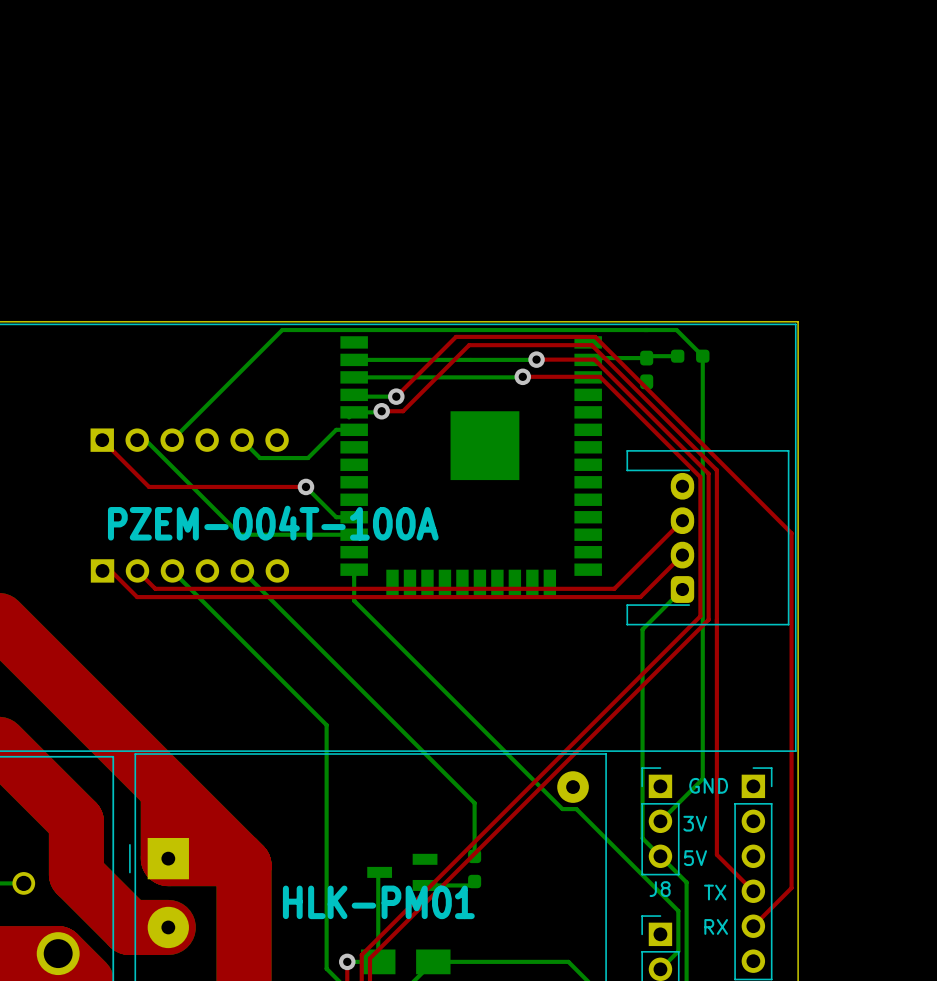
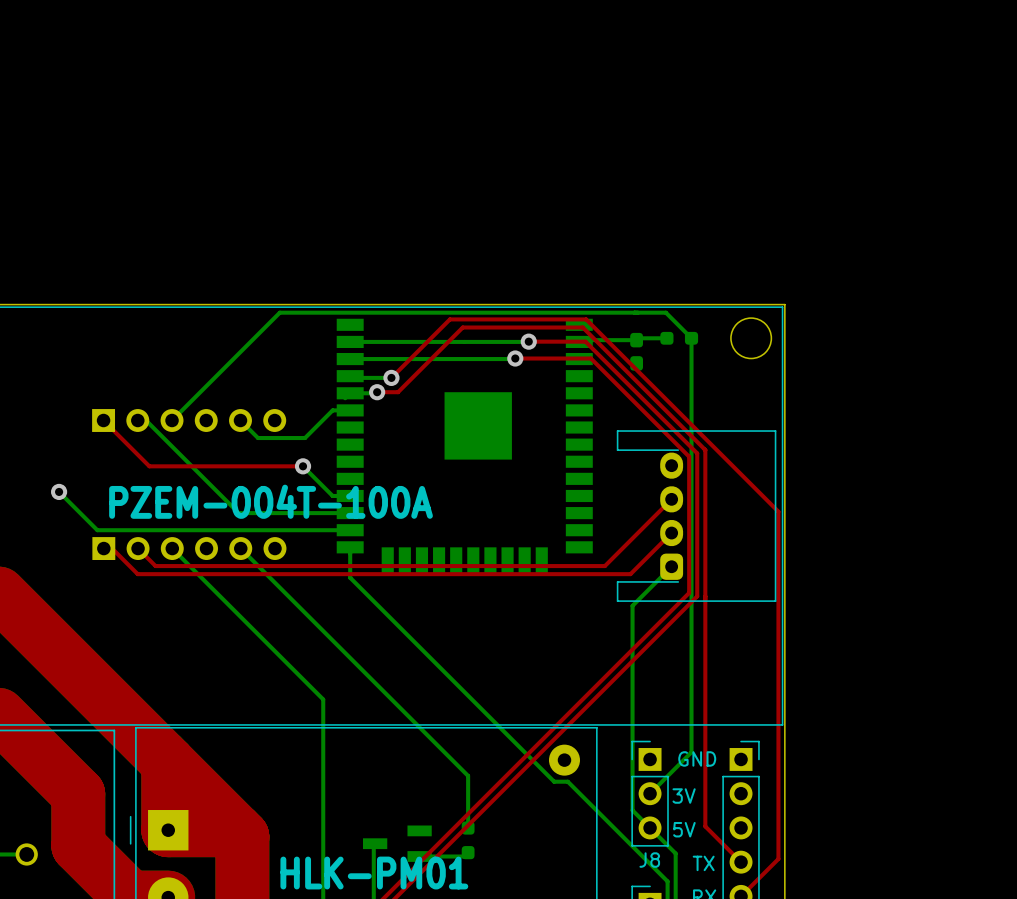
round board edge: none -> [730, 317, 772, 359]
bottom track: none -> (59, 491) (97, 530) (350, 530)
via: none -> (59, 491)

